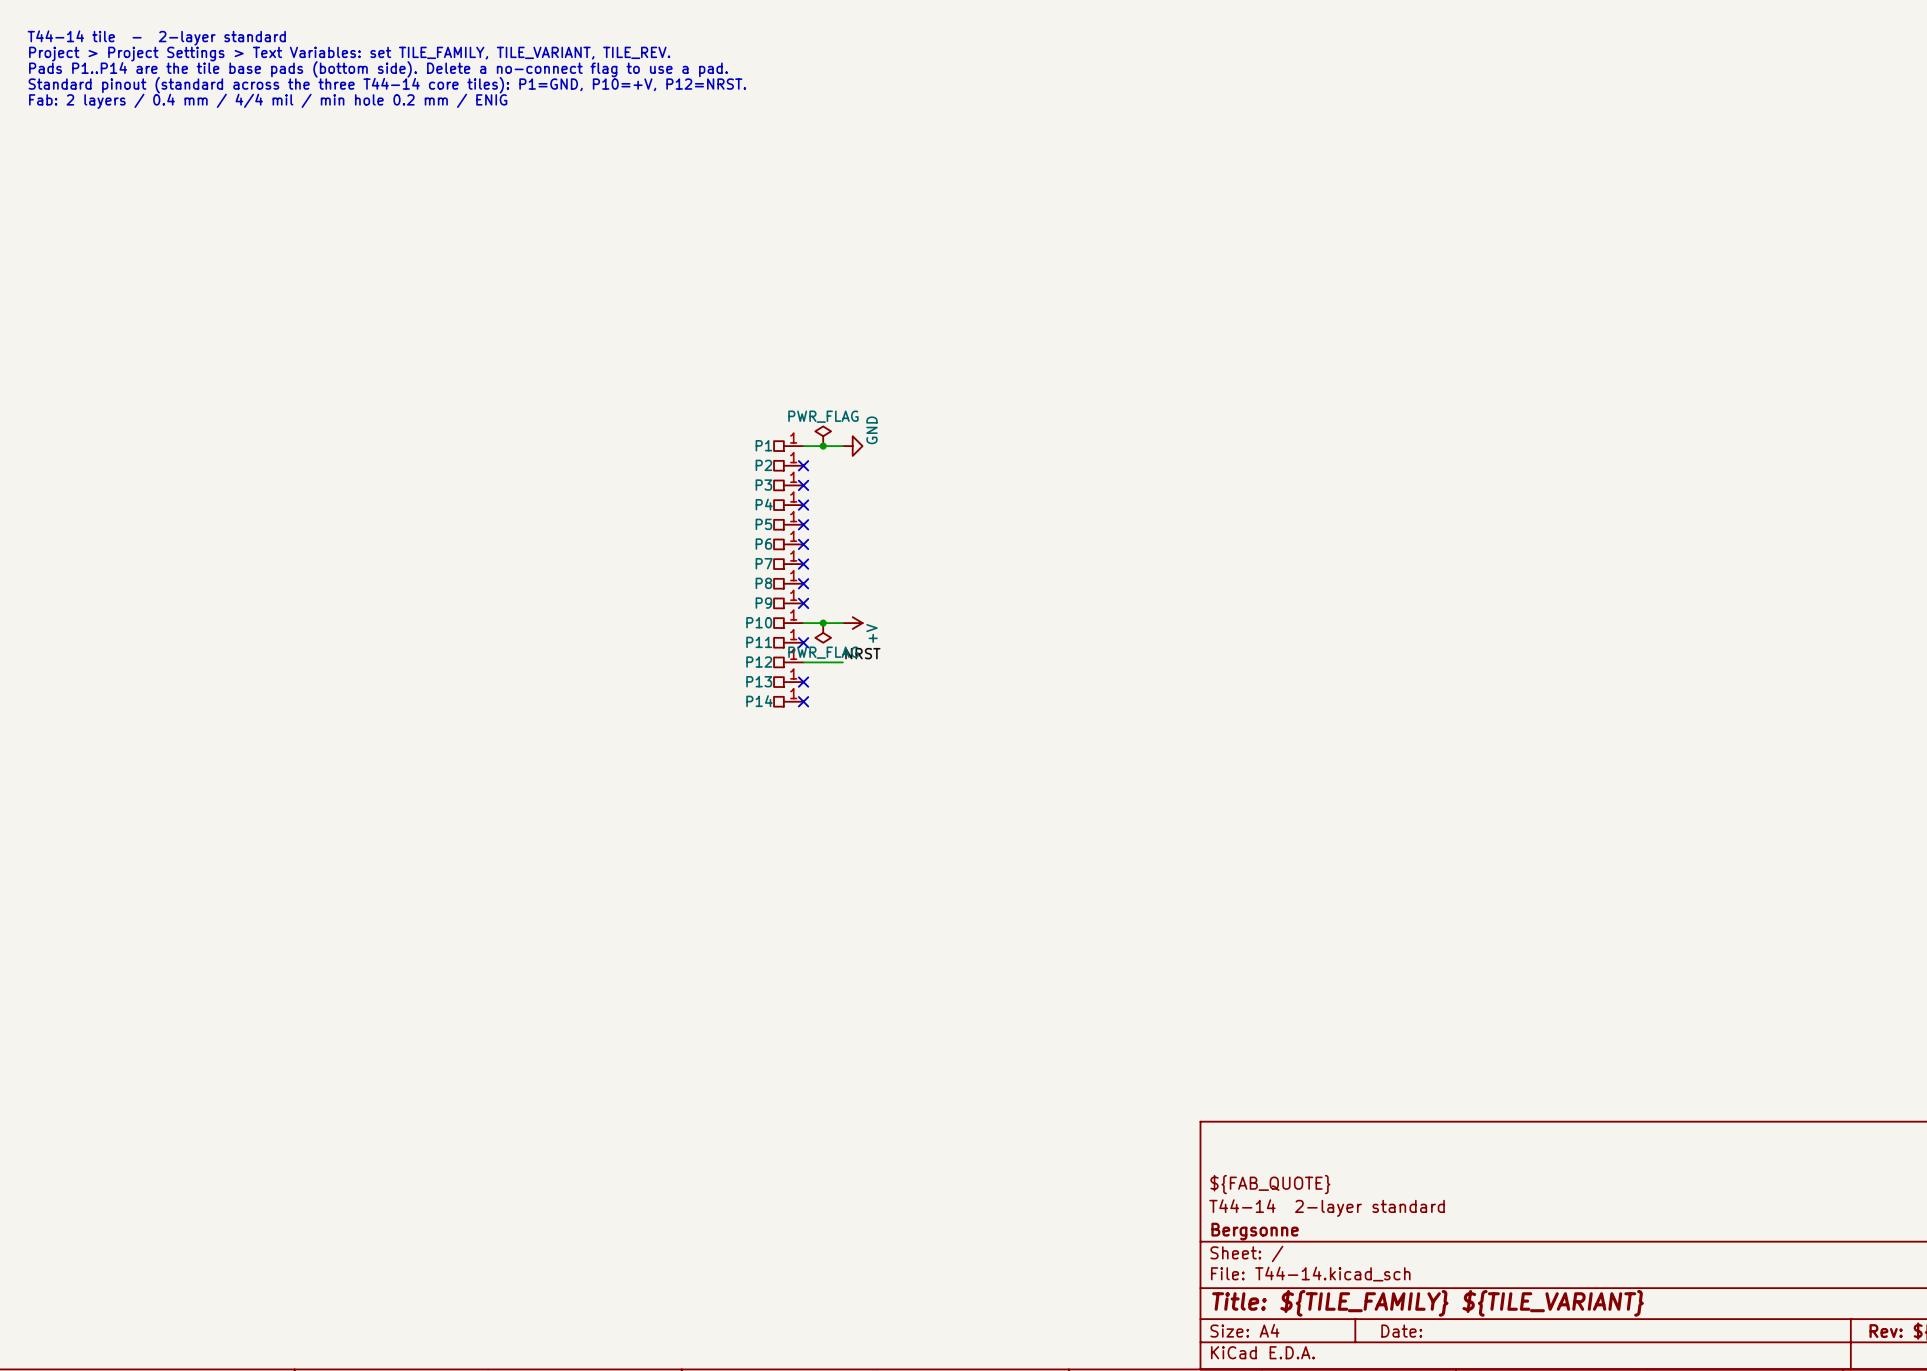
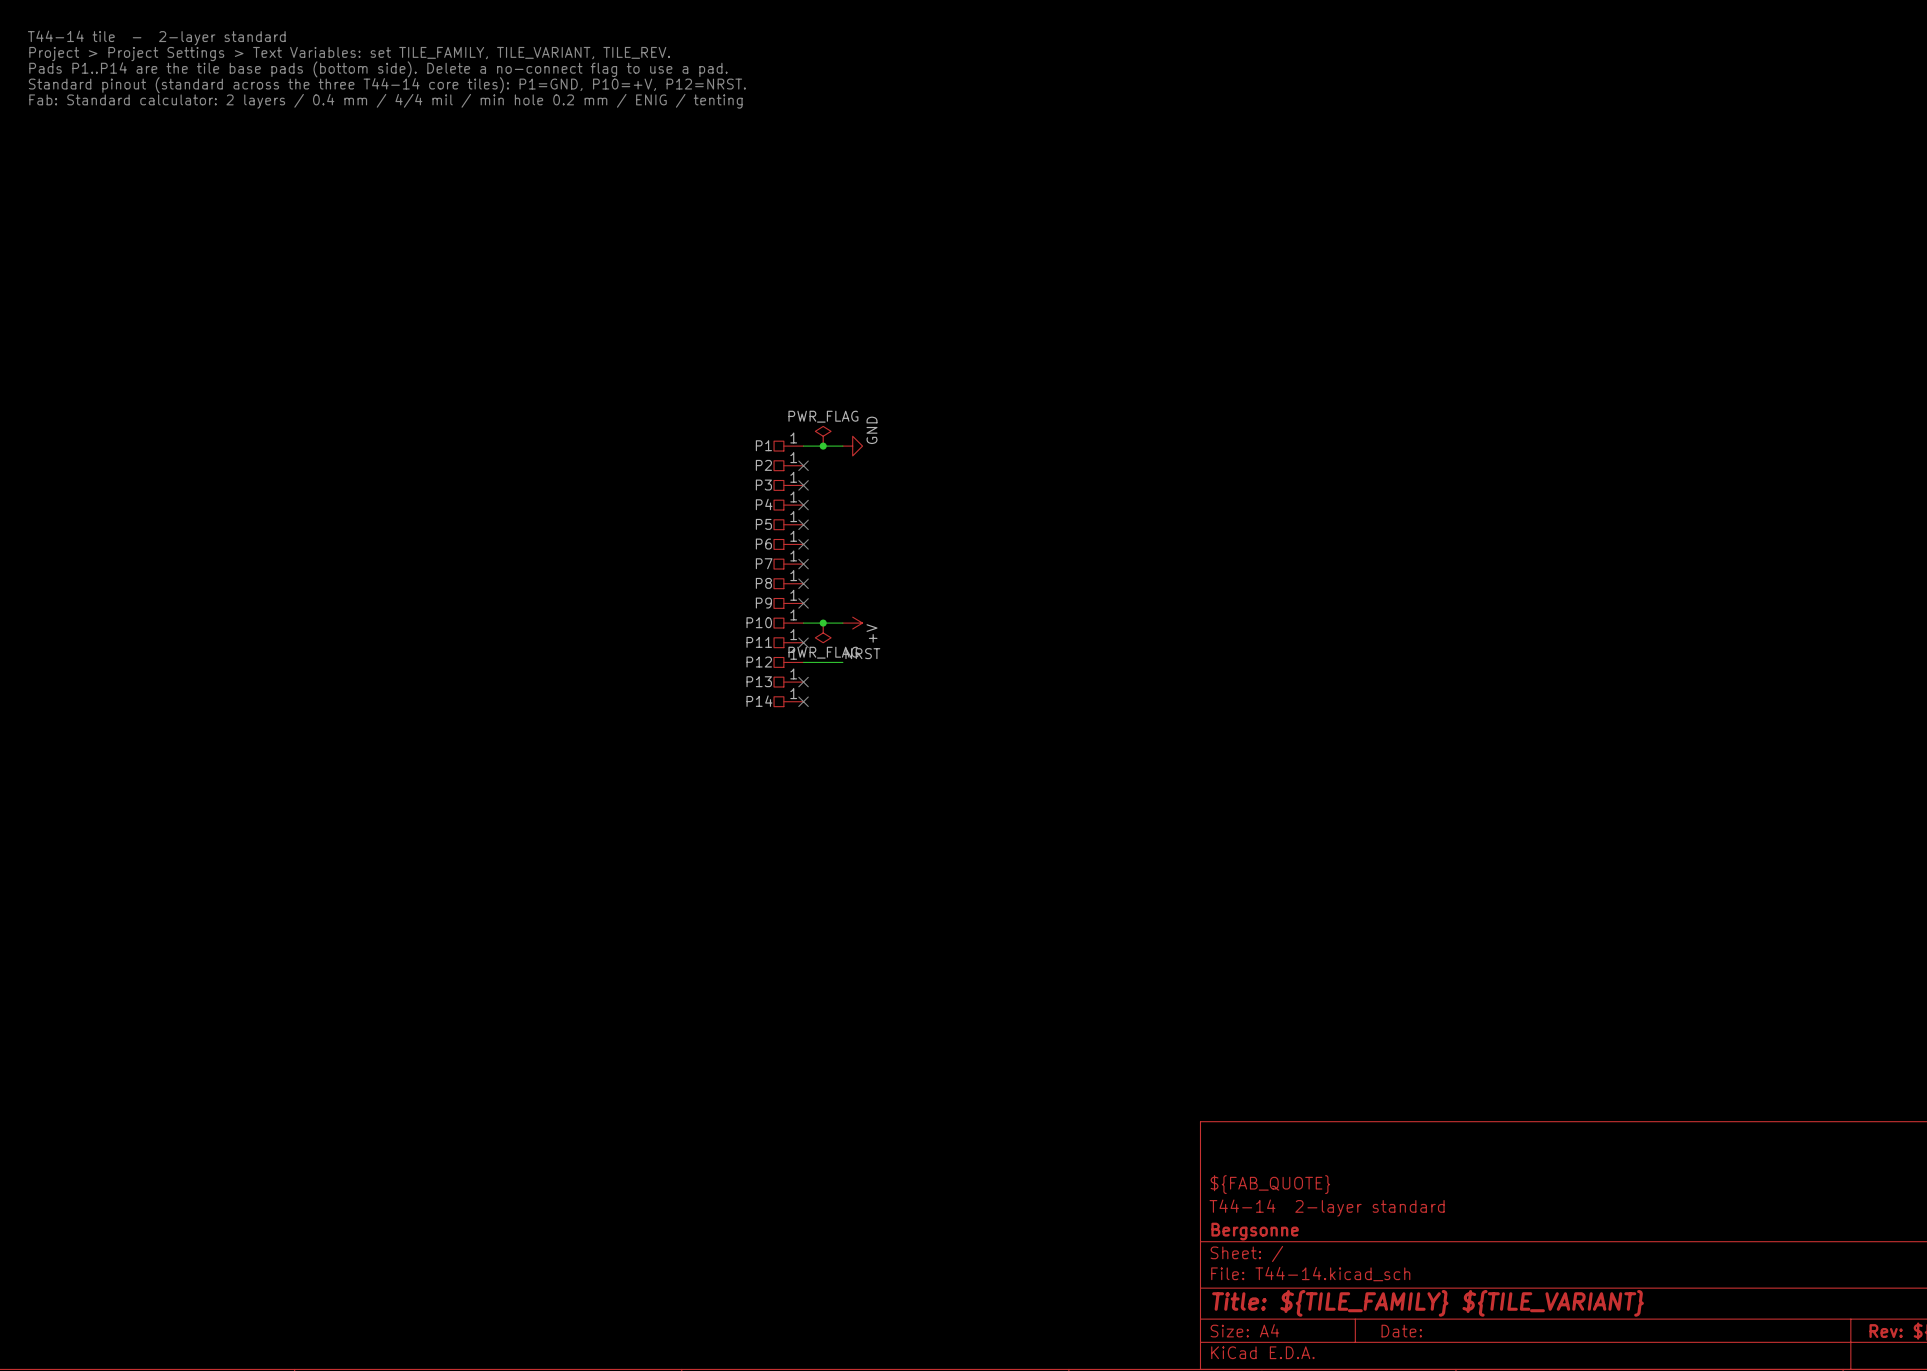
text: Fab: 2 layers / 0.4 mm / 4/4 mil / min hole 0.2 mm / ENIG (268, 101) -> Fab: Standard calculator: 2 layers / 0.4 mm / 4/4 mil / min hole 0.2 mm / ENIG / tenting (385, 101)

